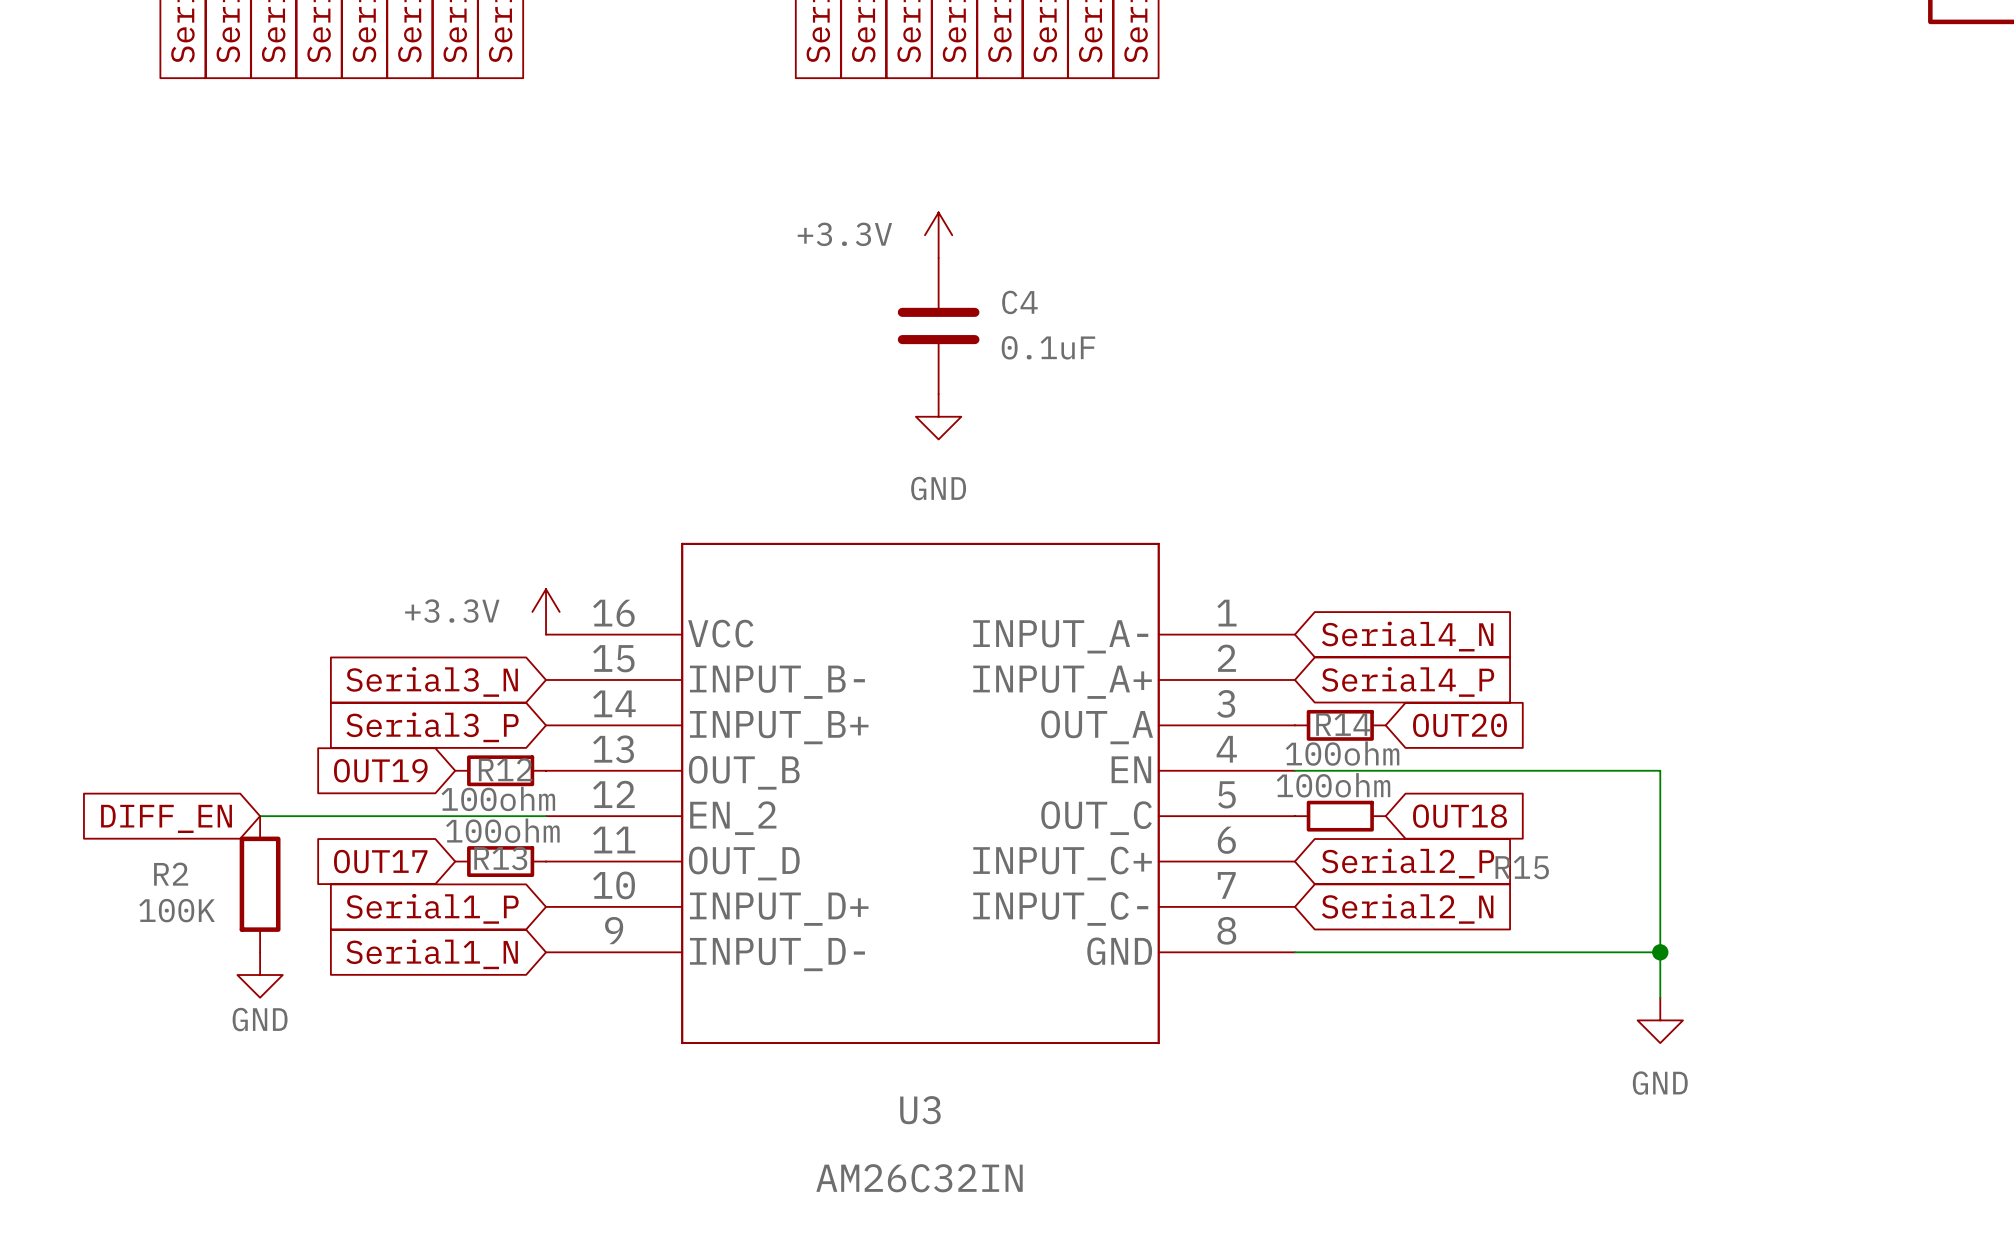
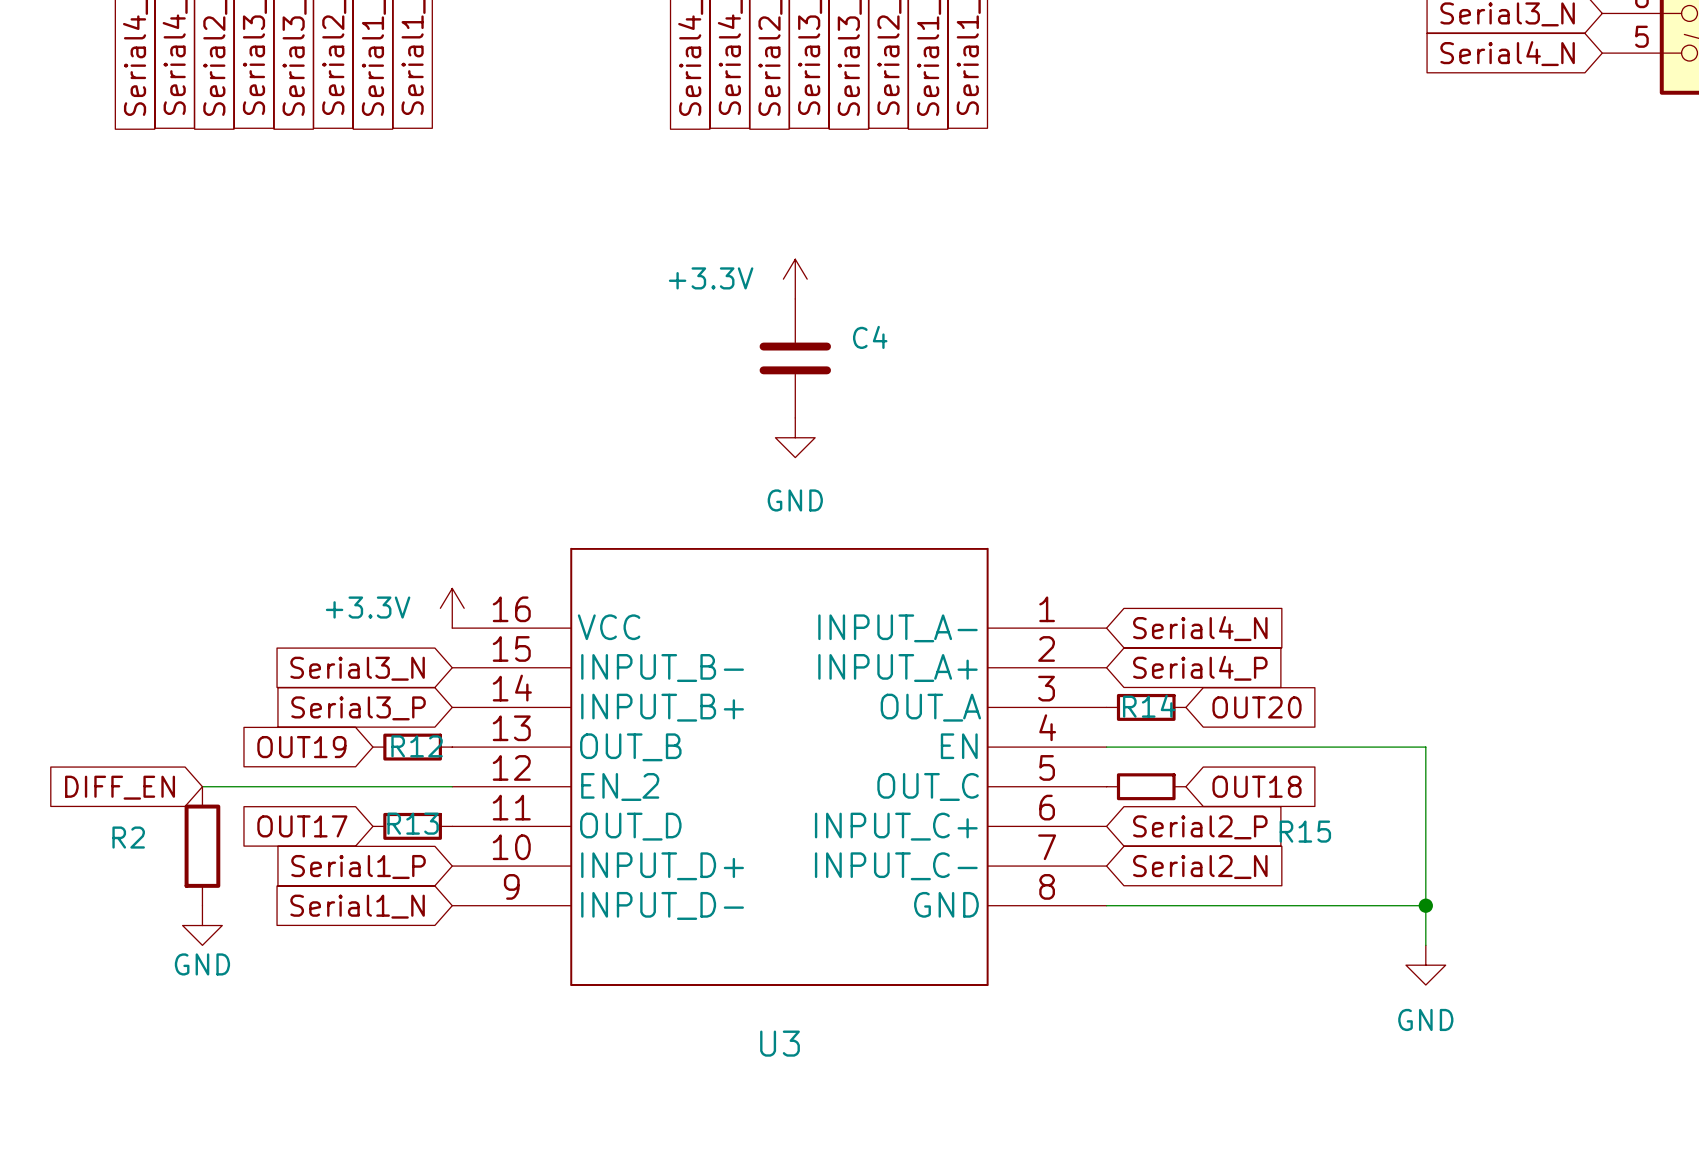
C4 value: 0.1uF (1048, 347) -> none
R14 value: 100ohm (1342, 753) -> none
R15 value: 100ohm (1333, 785) -> none
R12 value: 100ohm (498, 798) -> none
R13 value: 100ohm (502, 830) -> none
R2 value: 100K (177, 910) -> none
U3 value: AM26C32IN (919, 1178) -> none

